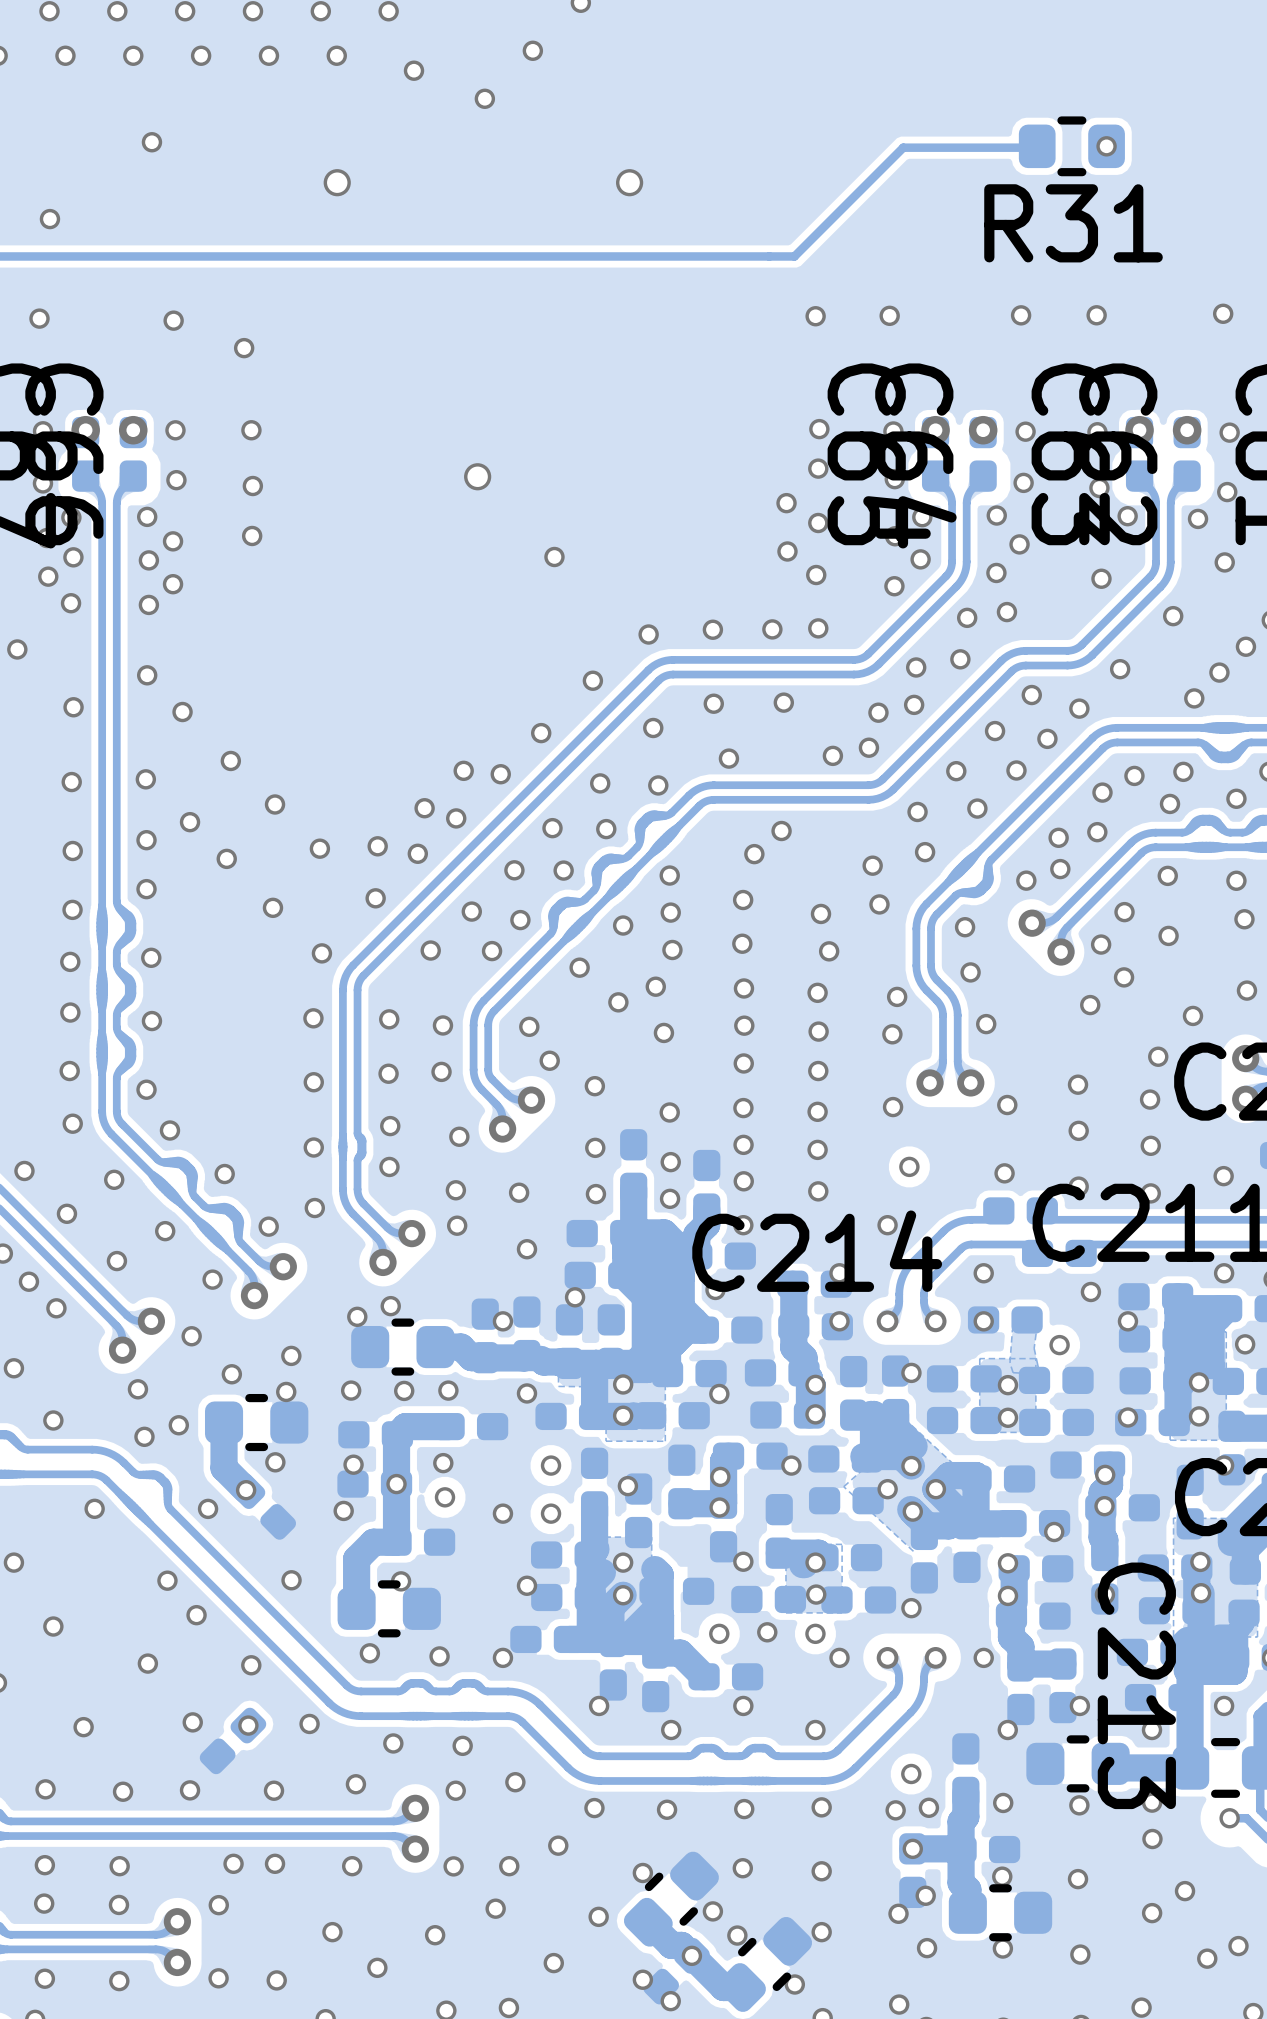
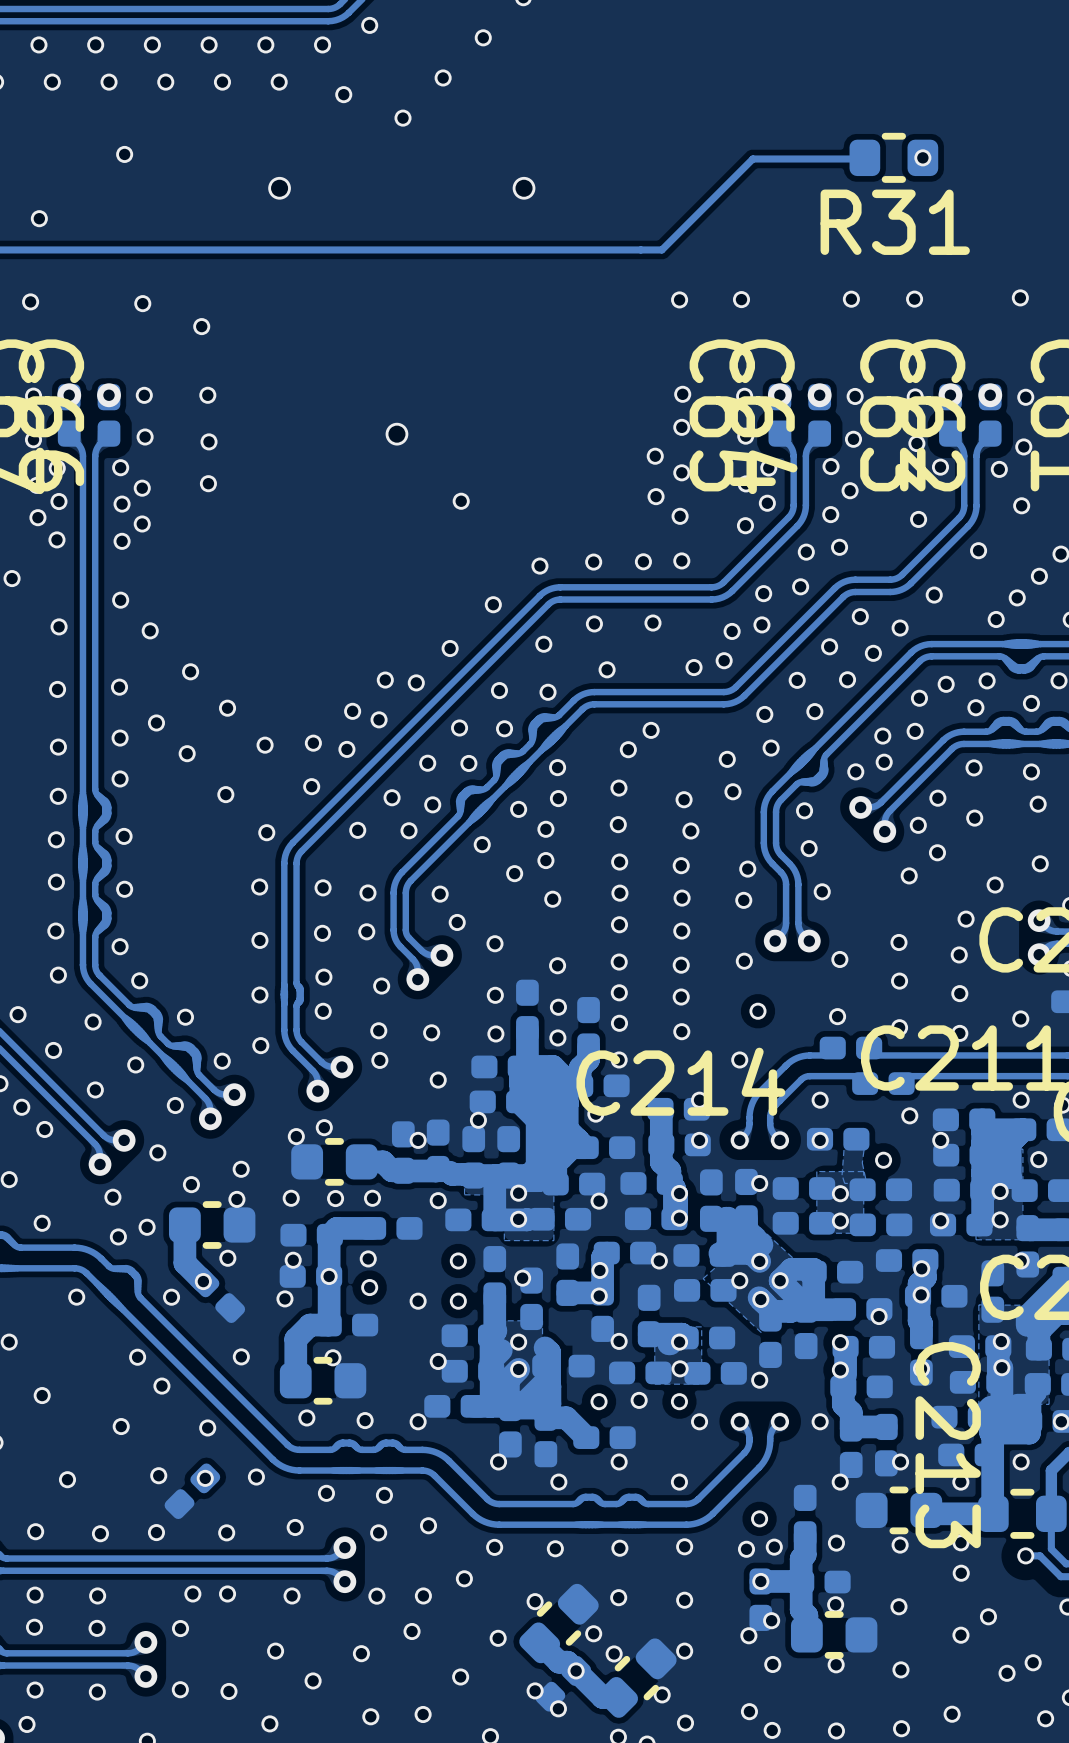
via position: (672, 949) -> (545, 829)

